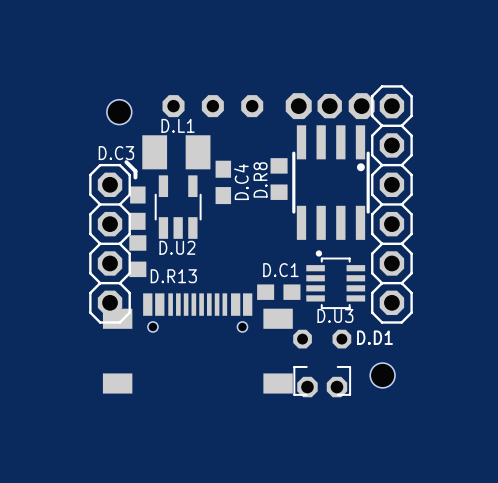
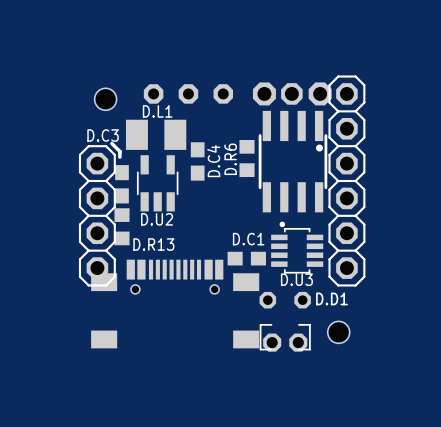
D.R8 name: D.R8 (260, 179) -> D.R6 (230, 159)

